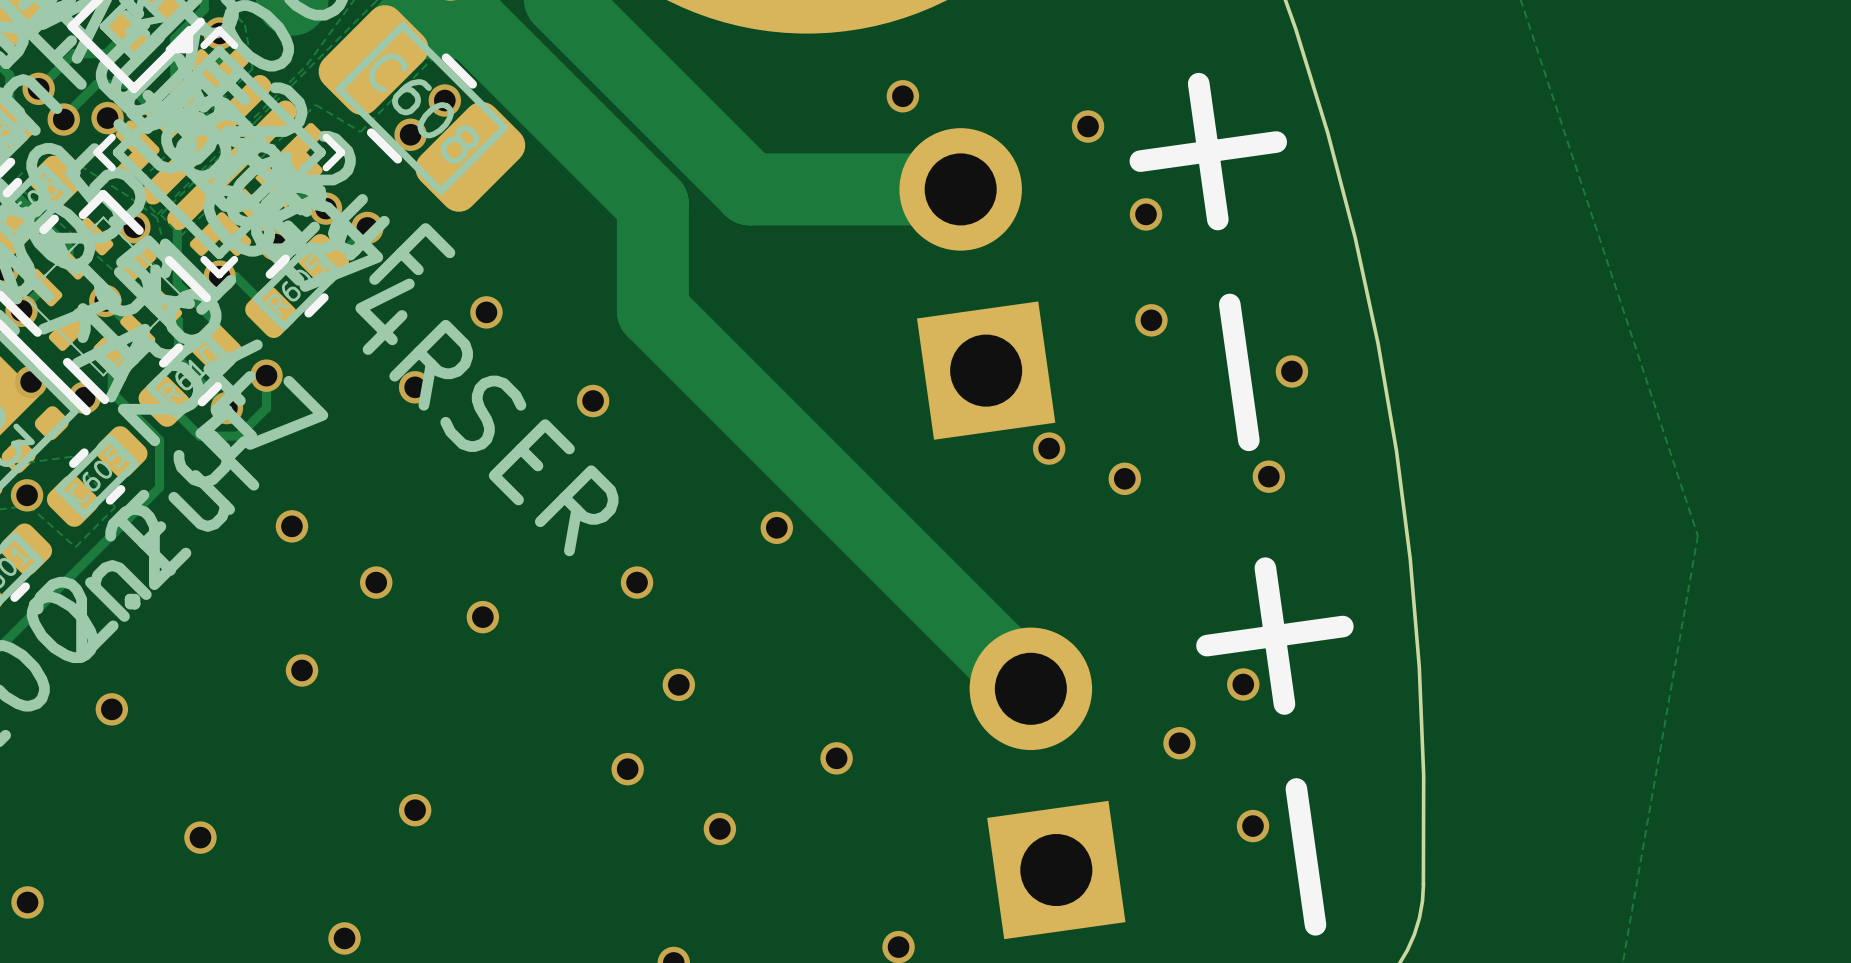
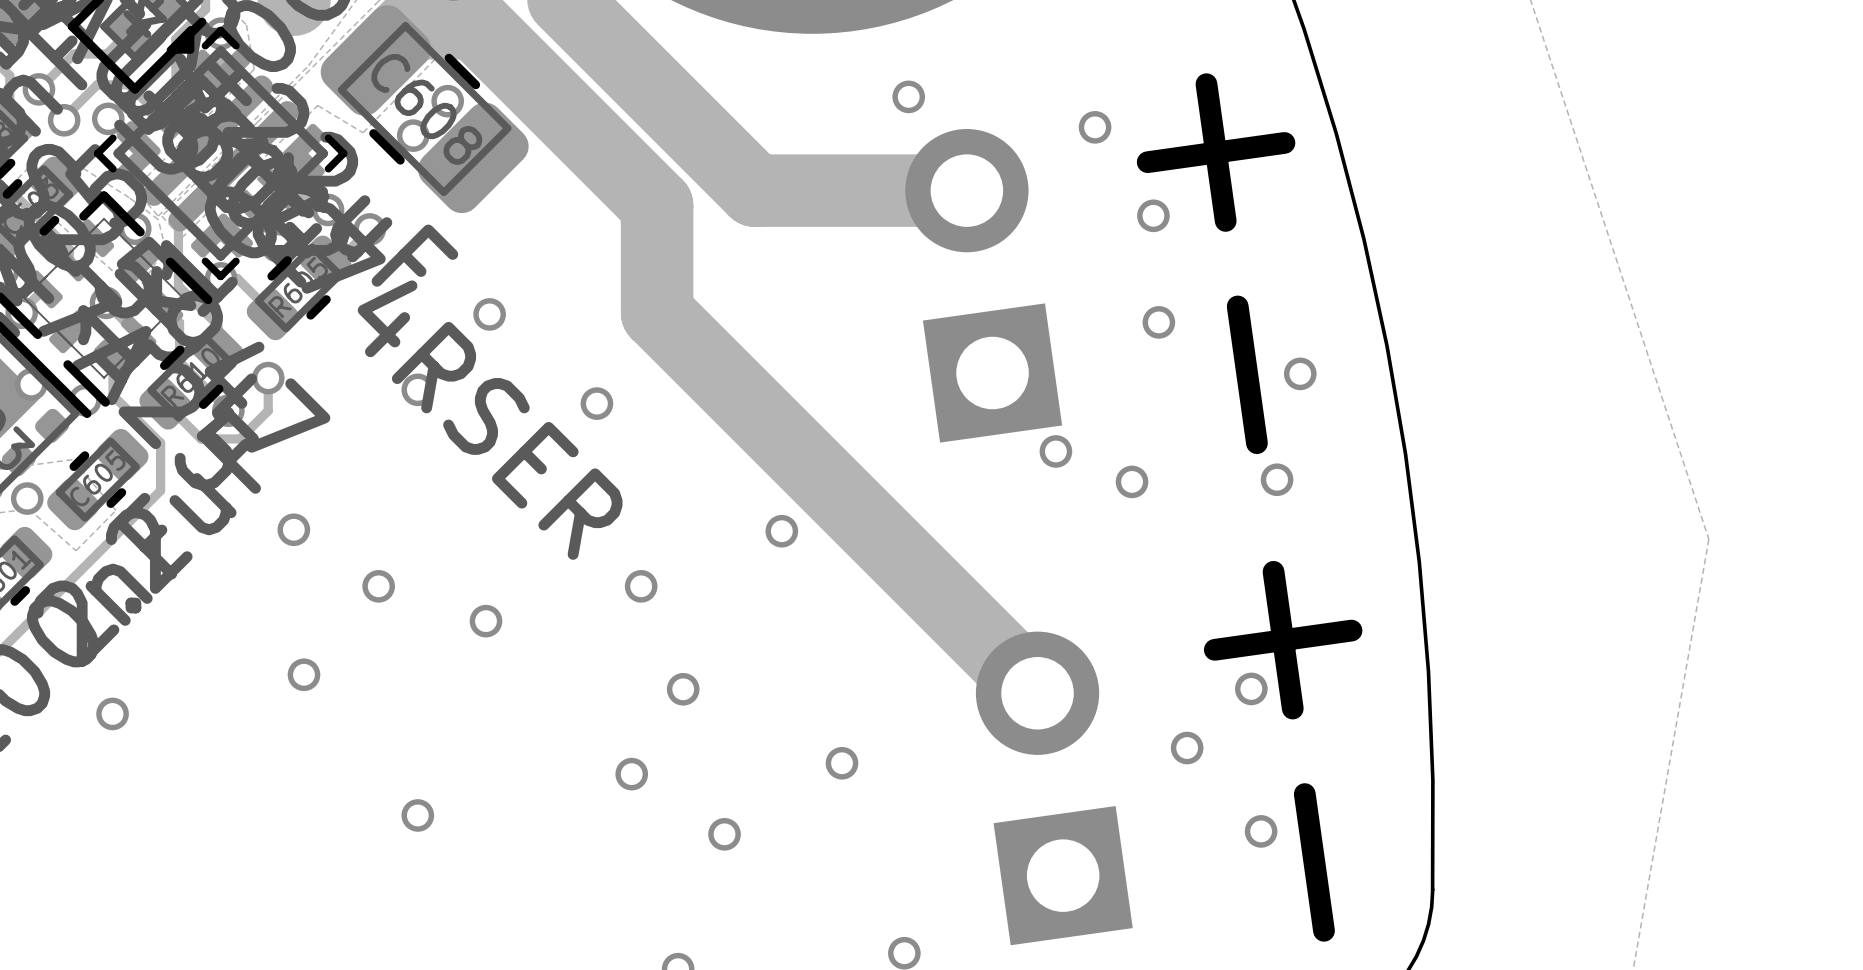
via: (200, 837) -> none
via: (27, 902) -> none
via: (344, 938) -> none

